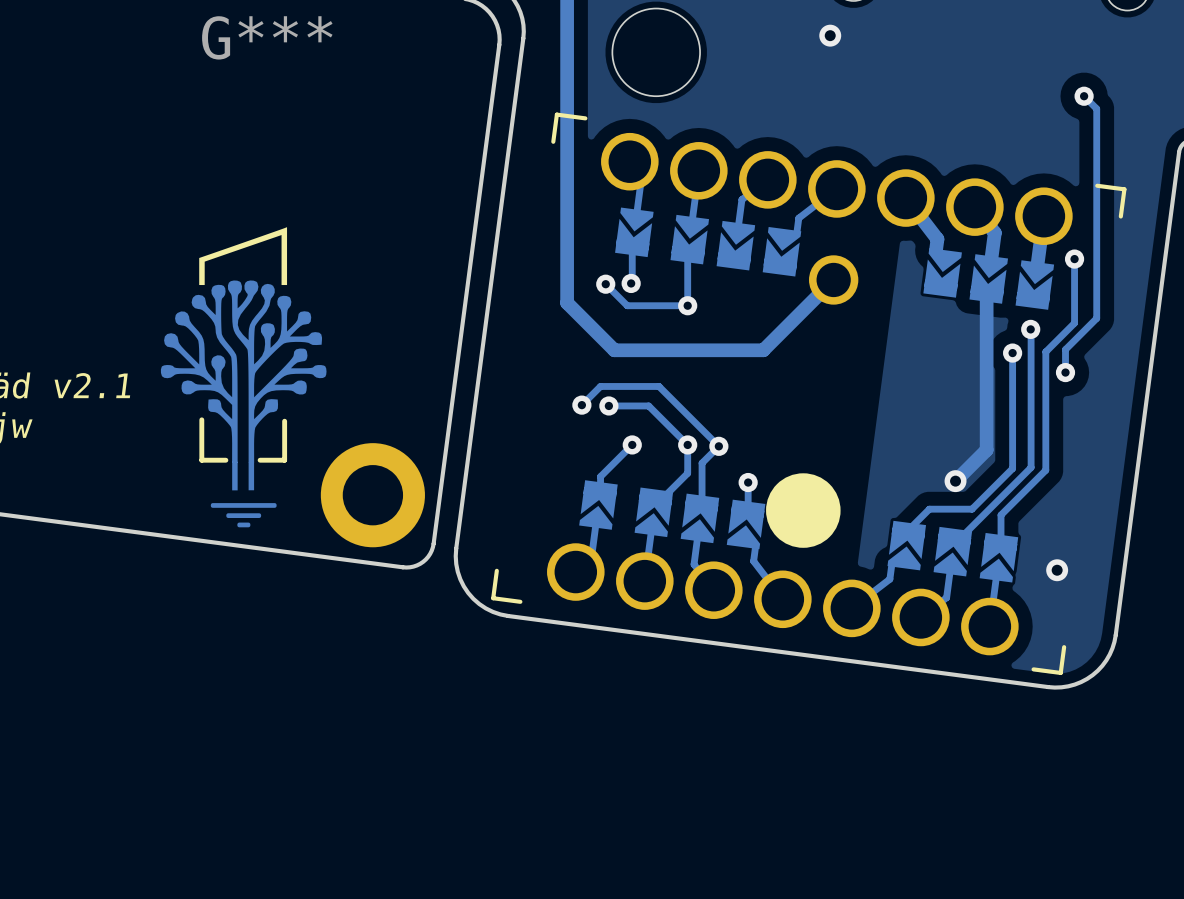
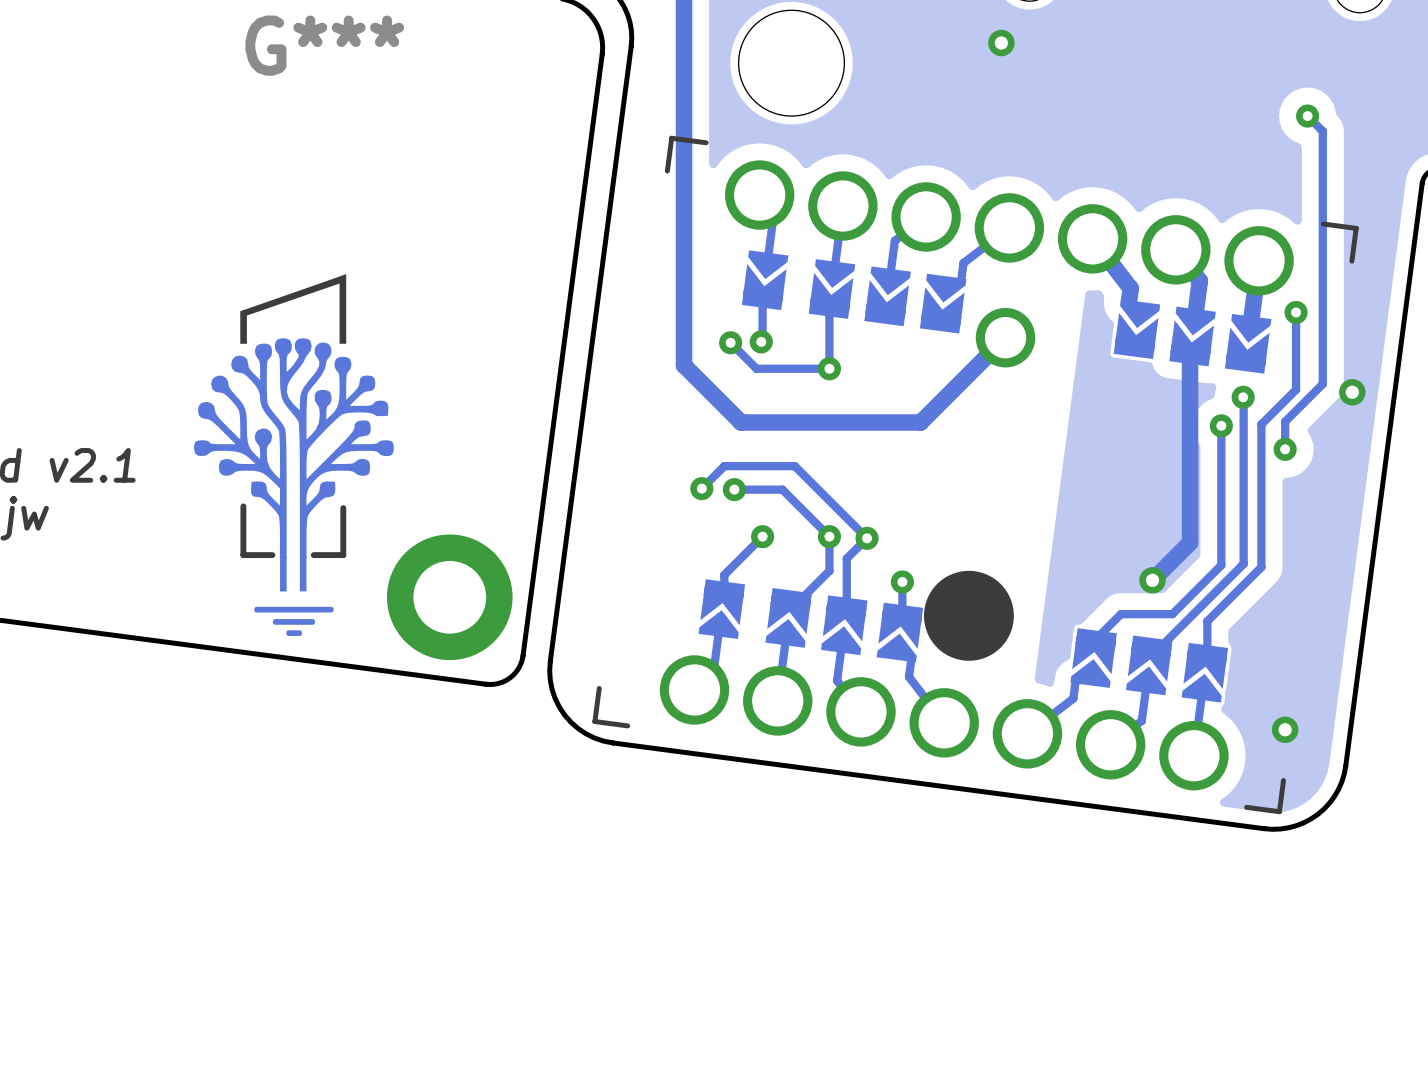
via: none -> (1352, 392)
via position: (1057, 570) -> (1285, 729)

